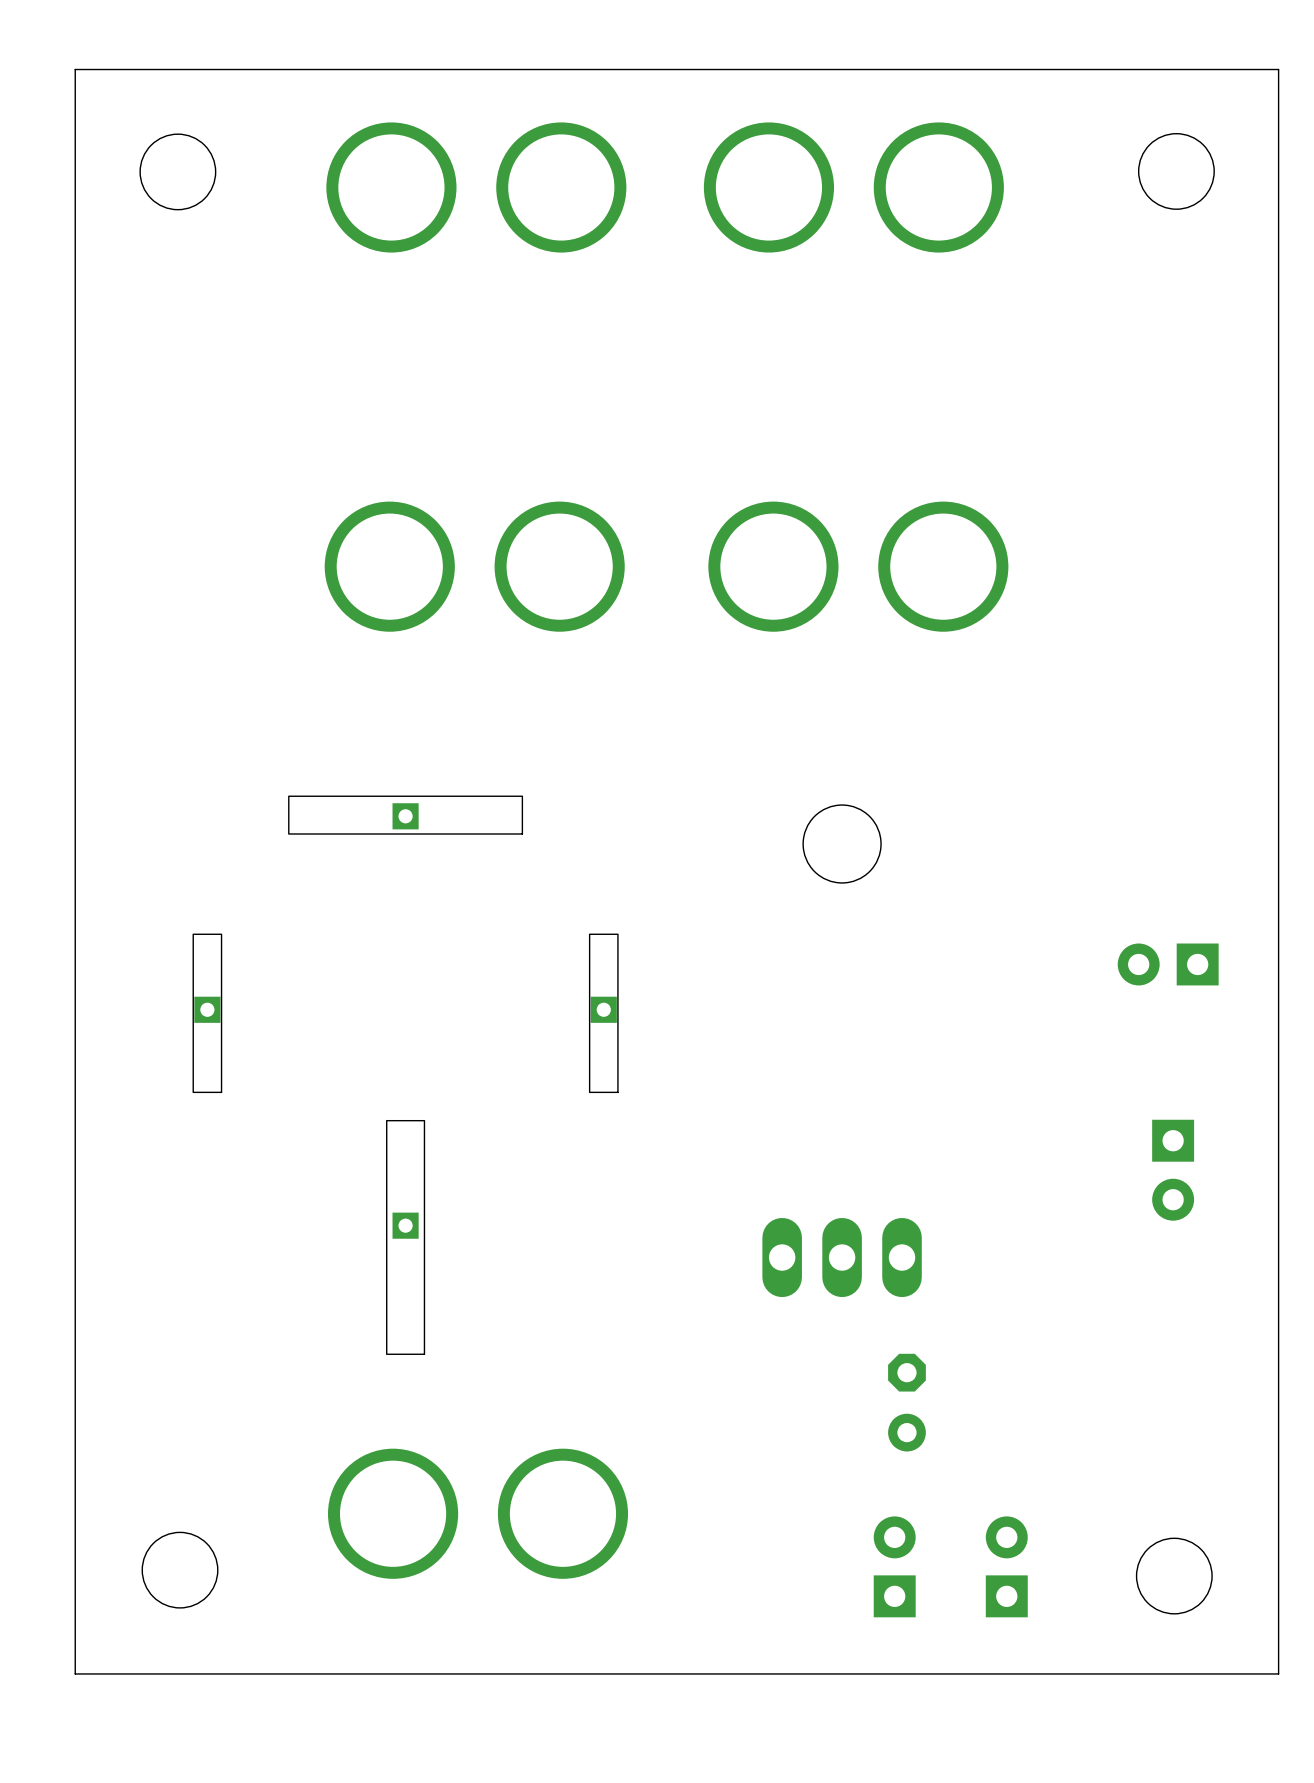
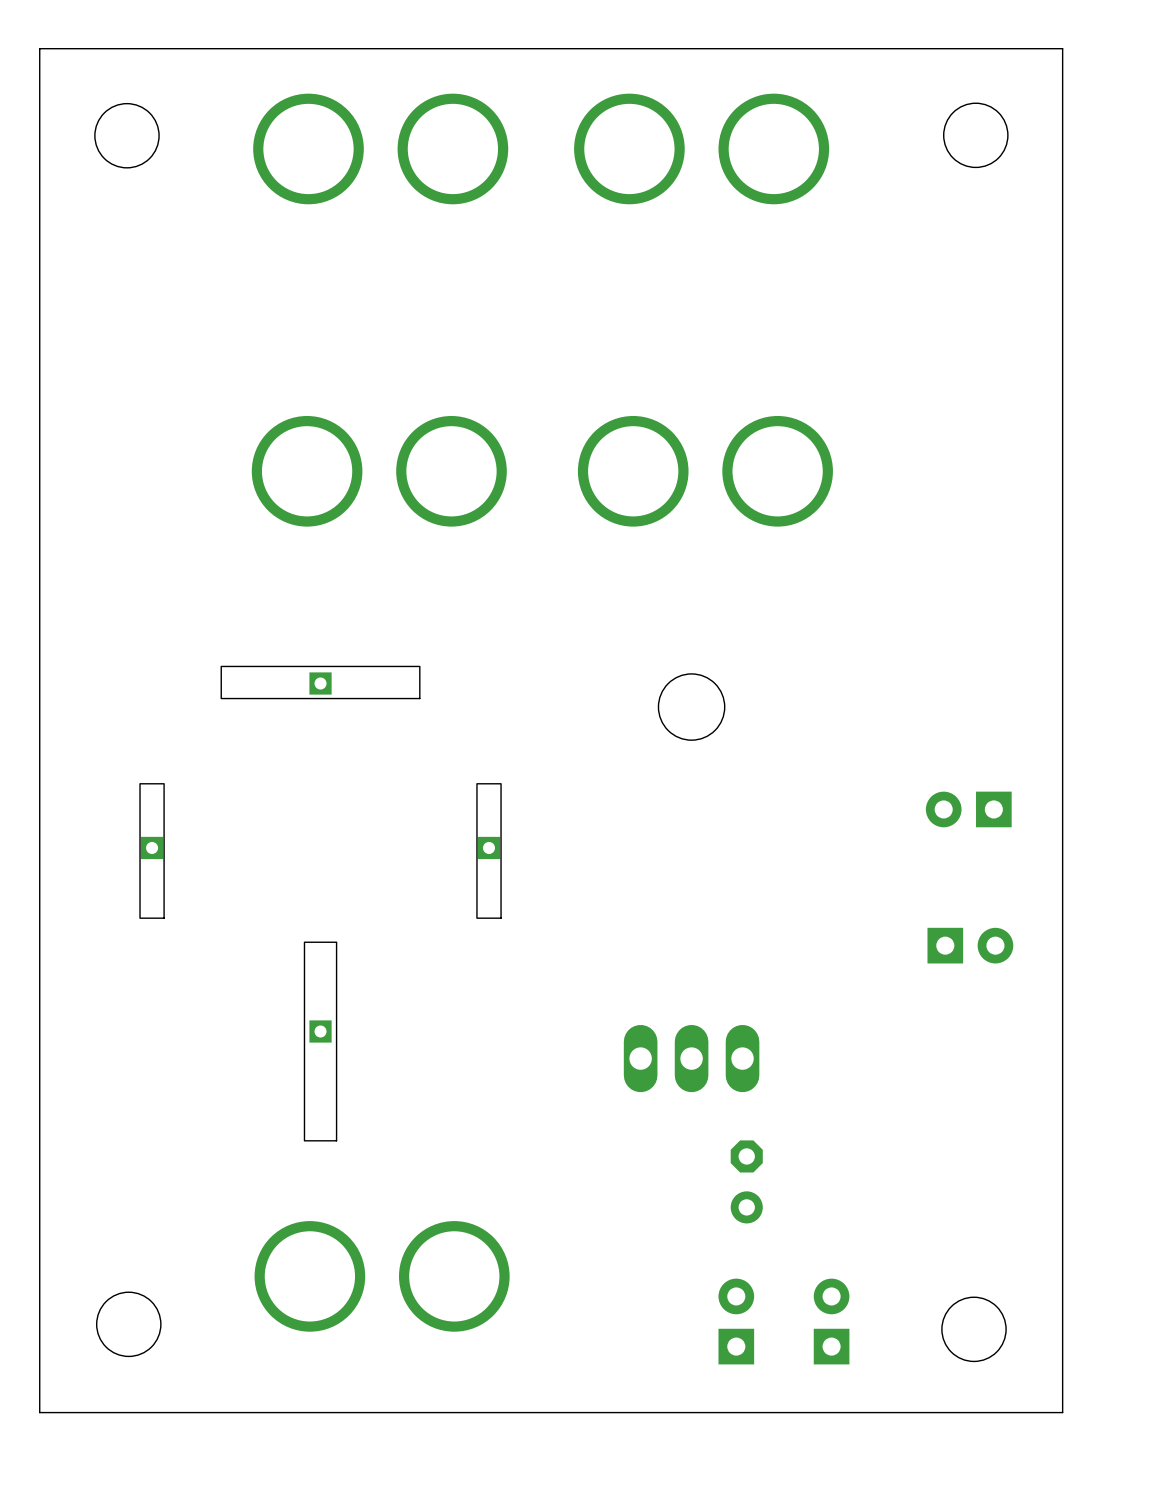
part rotation: 0° (1173, 1170) -> 90° counterclockwise (970, 945)

